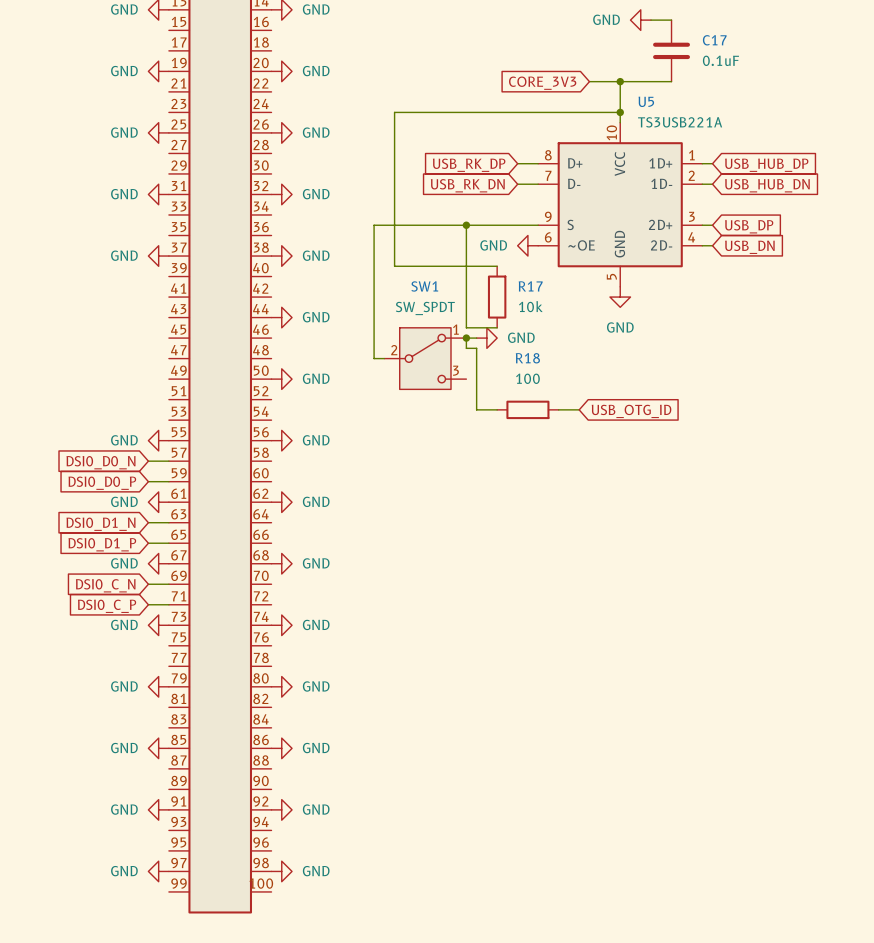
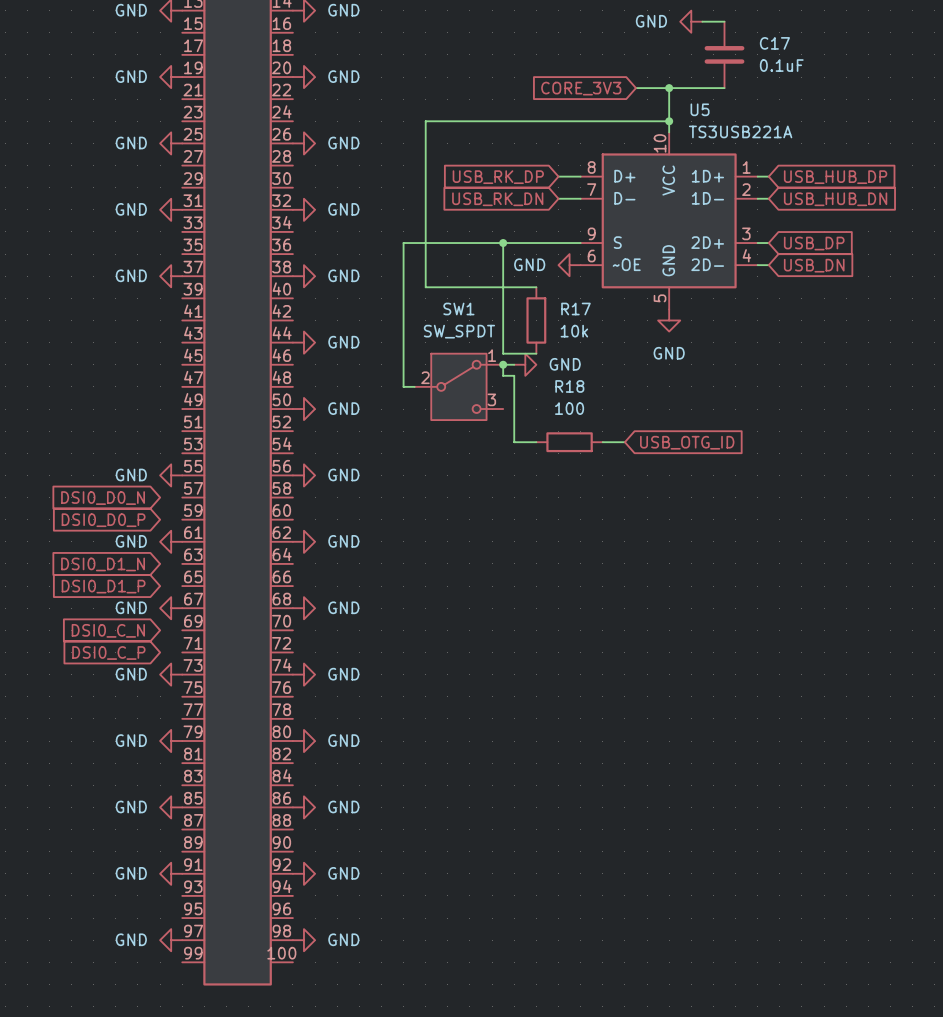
wire: (148, 461) (168, 461) -> none
wire: (148, 481) (168, 481) -> none
wire: (148, 522) (168, 522) -> none
wire: (148, 543) (168, 543) -> none
wire: (148, 584) (168, 584) -> none
wire: (148, 604) (168, 604) -> none

